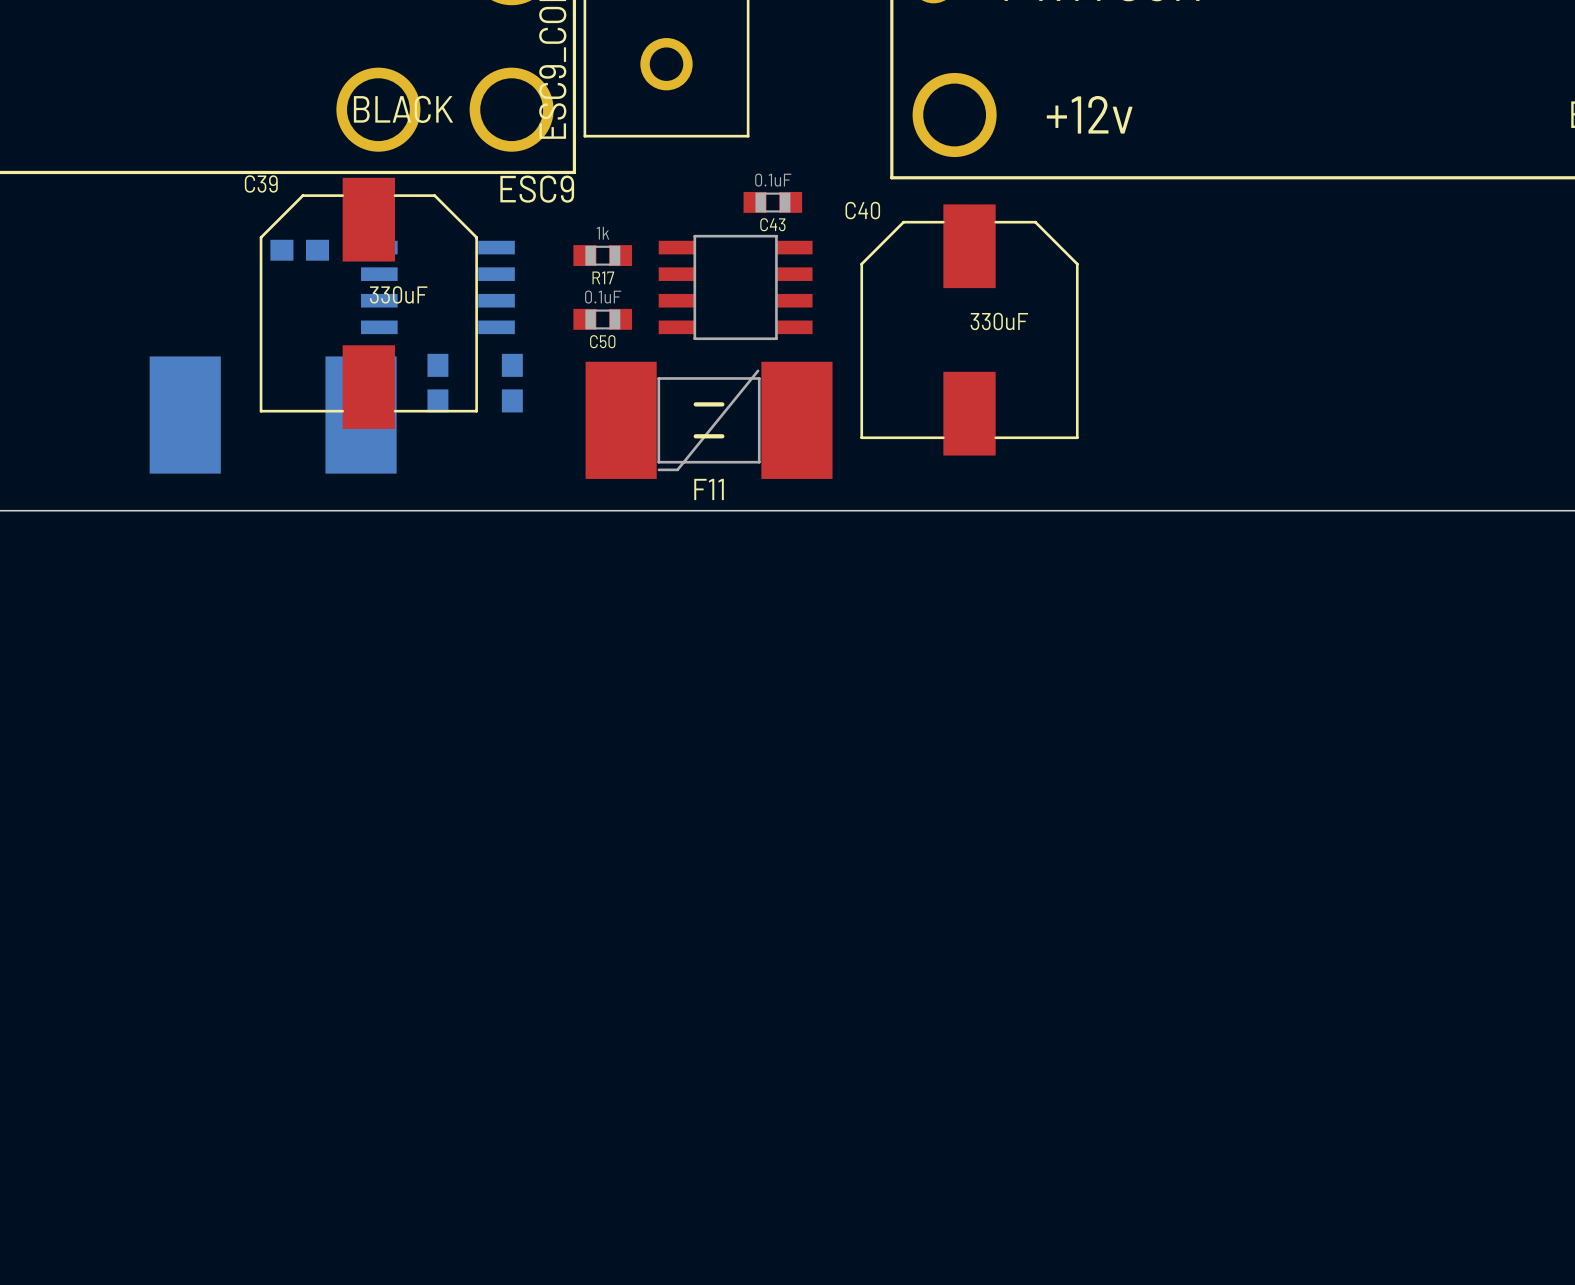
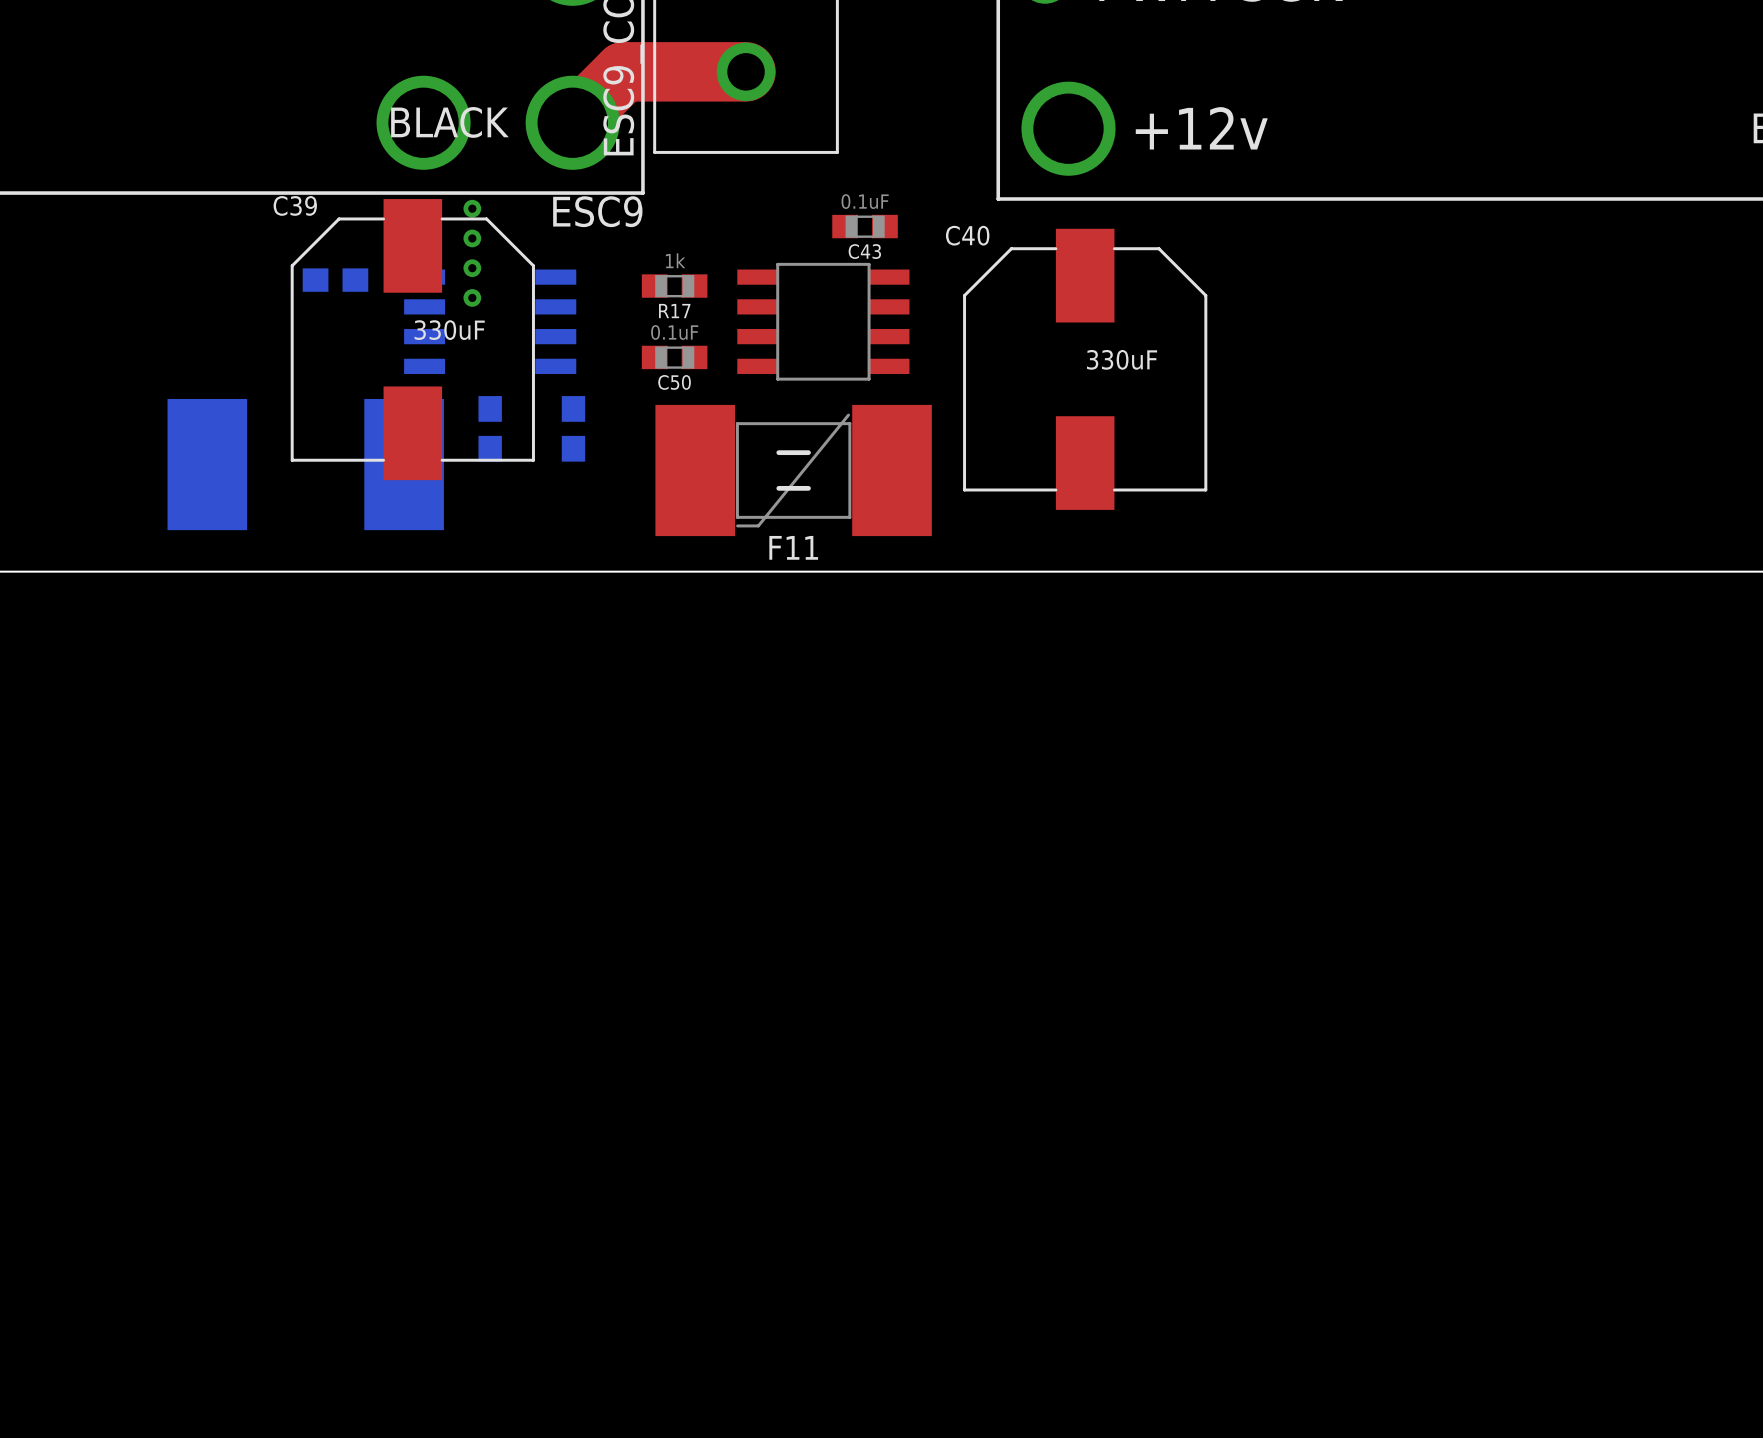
top track: none -> (746, 71) (623, 71) (572, 122)
via: none -> (472, 208)
via: none -> (472, 238)
via: none -> (472, 268)
via: none -> (472, 297)

